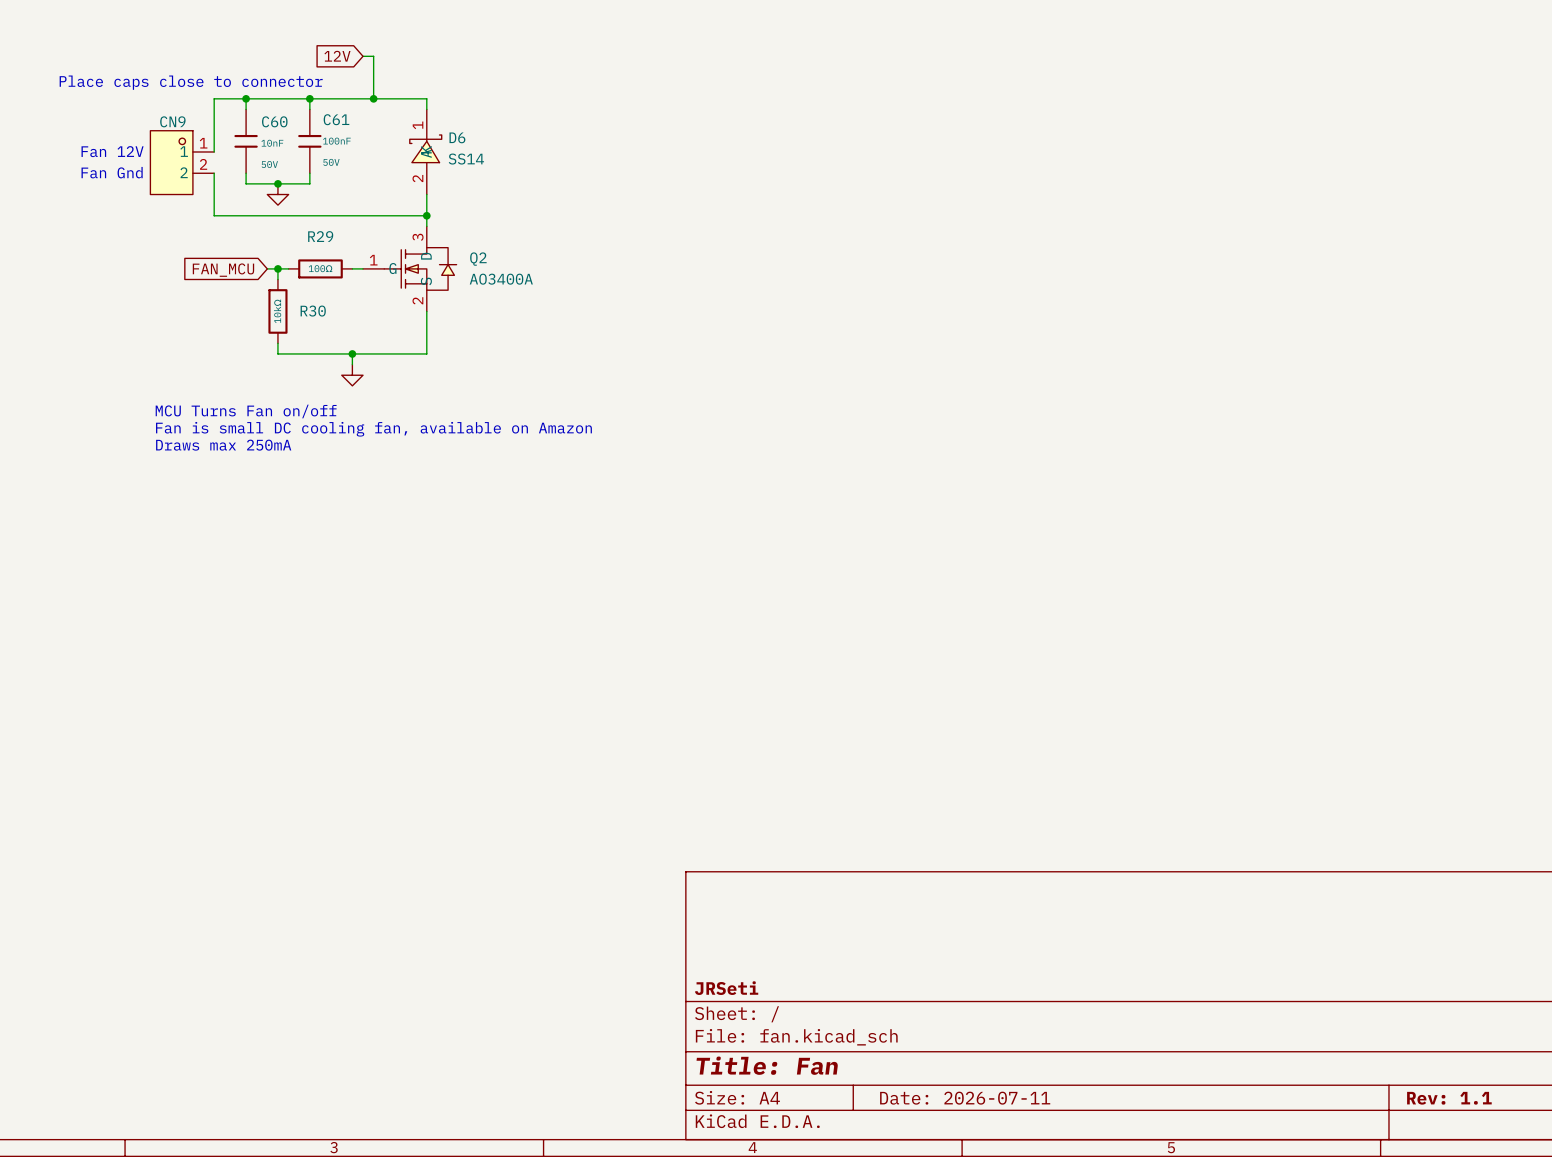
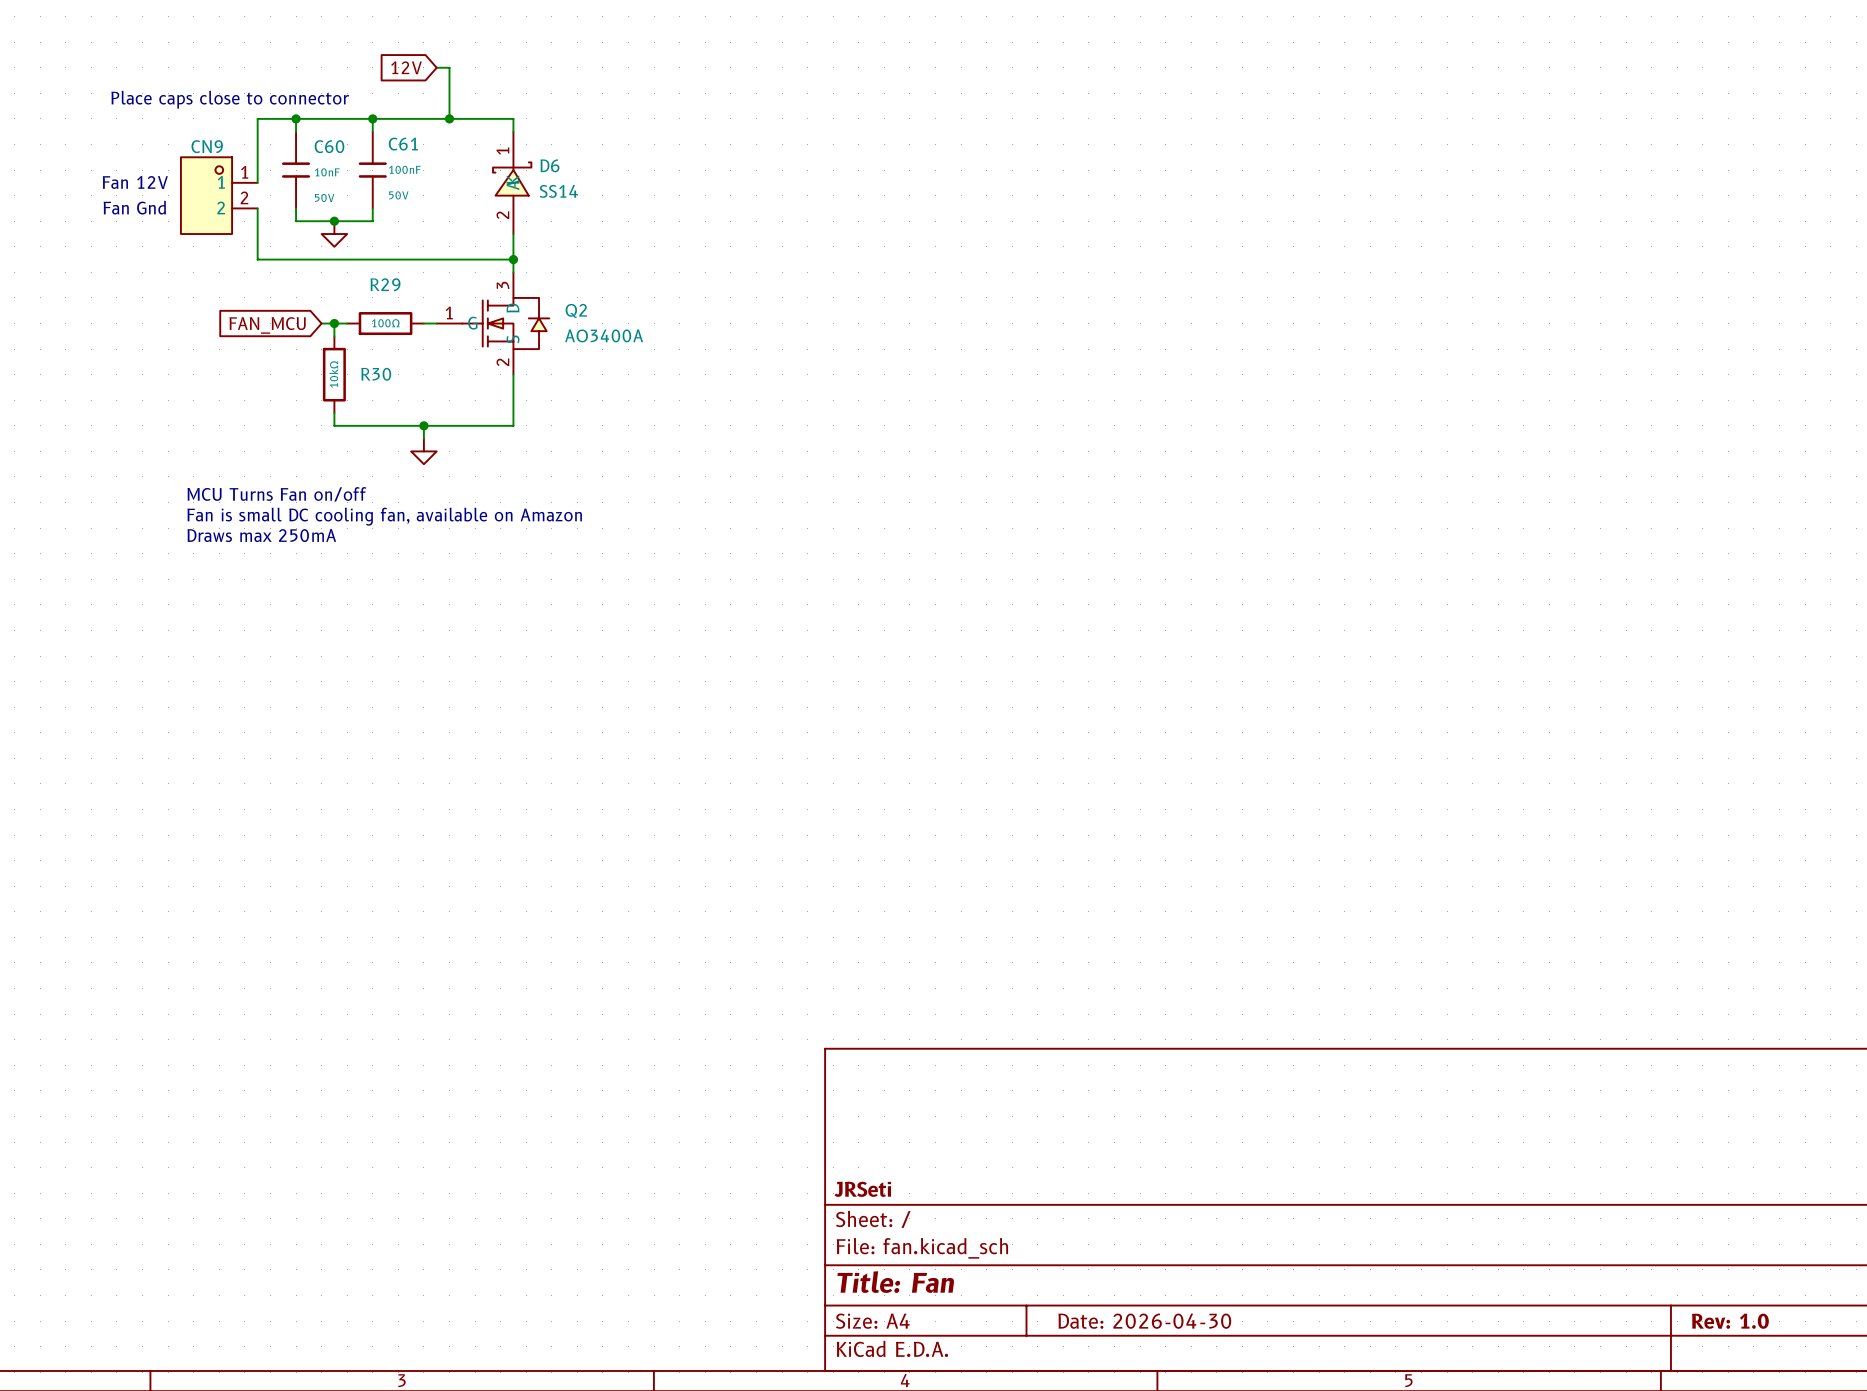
title block: Date: 2026-07-11 (965, 1098) -> Date: 2026-04-30 (1144, 1321)
title block: Rev: 1.1 (1449, 1098) -> Rev: 1.0 (1730, 1321)

